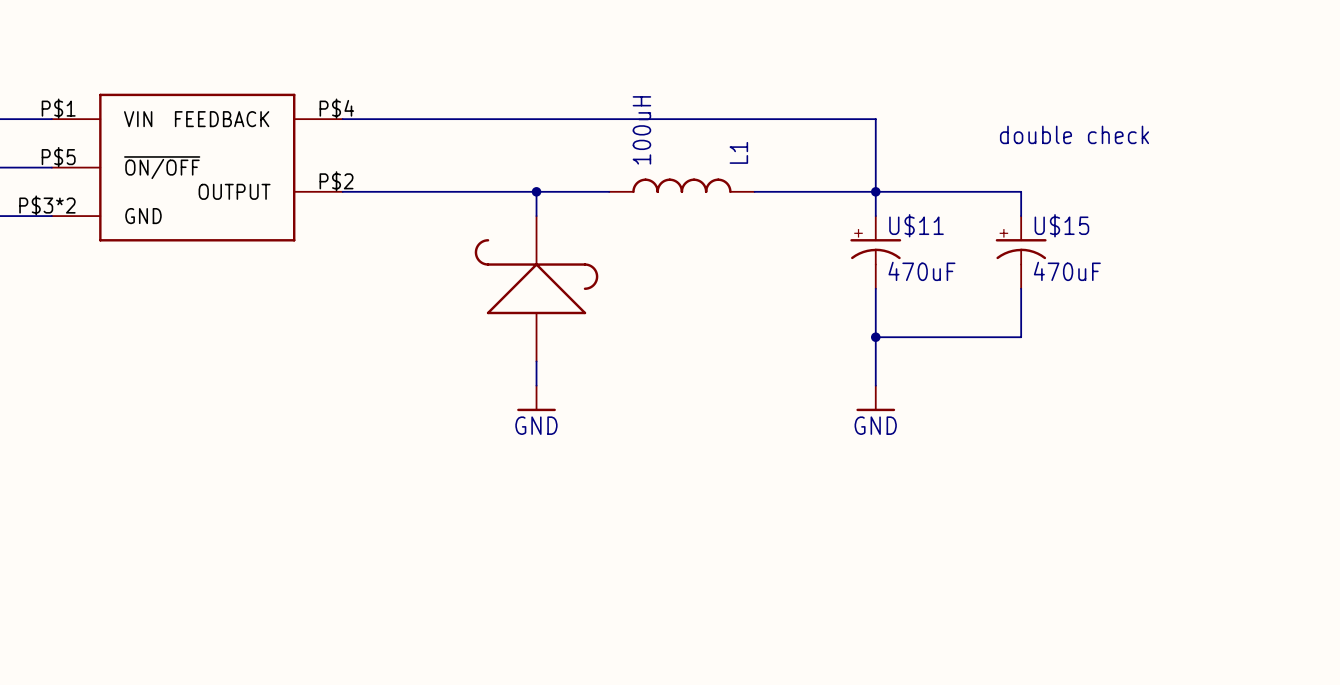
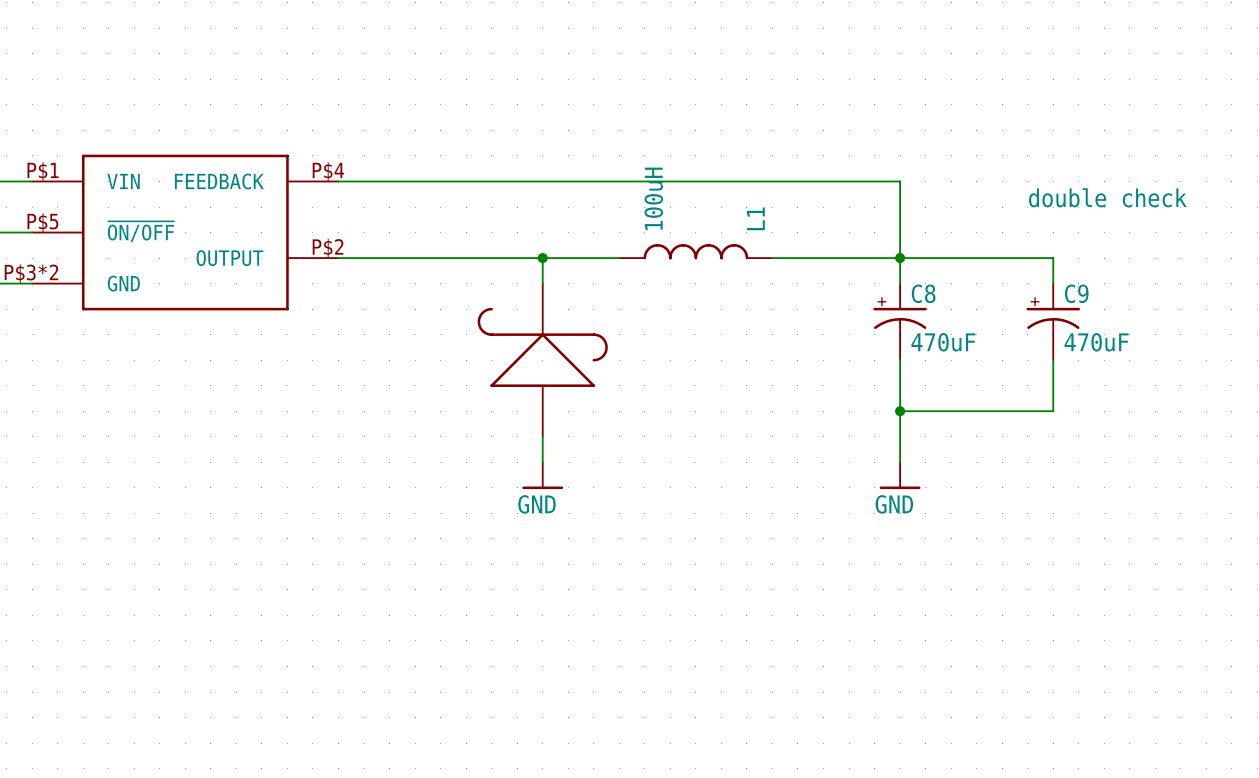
U$11 name: U$11 (916, 225) -> C8 (923, 293)
U$15 name: U$15 (1061, 225) -> C9 (1076, 293)

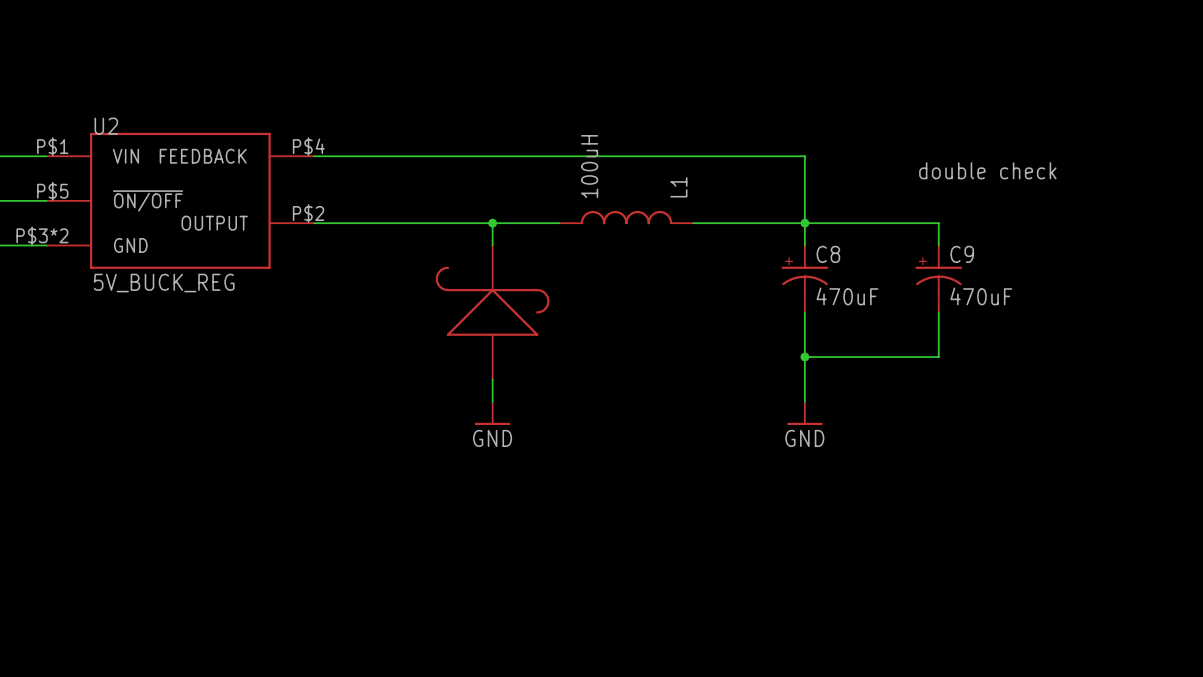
U2 name: none -> U2 (106, 126)
U2 value: none -> 5V_BUCK_REG (164, 283)

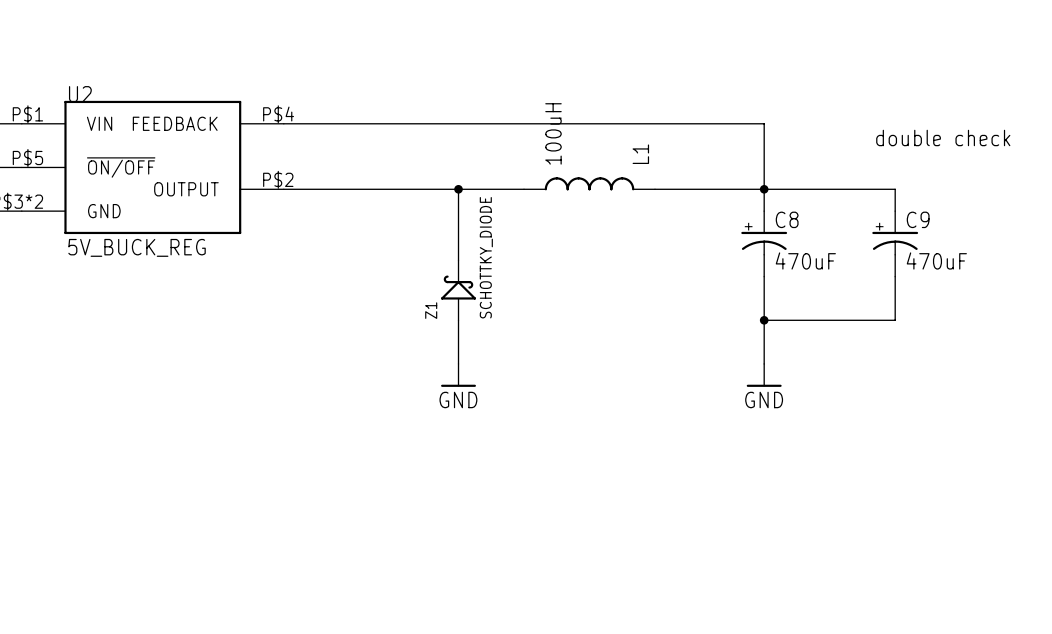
part: (492, 312) -> none
Z1: none -> SCHOTTKY_DIODE (458, 290)

